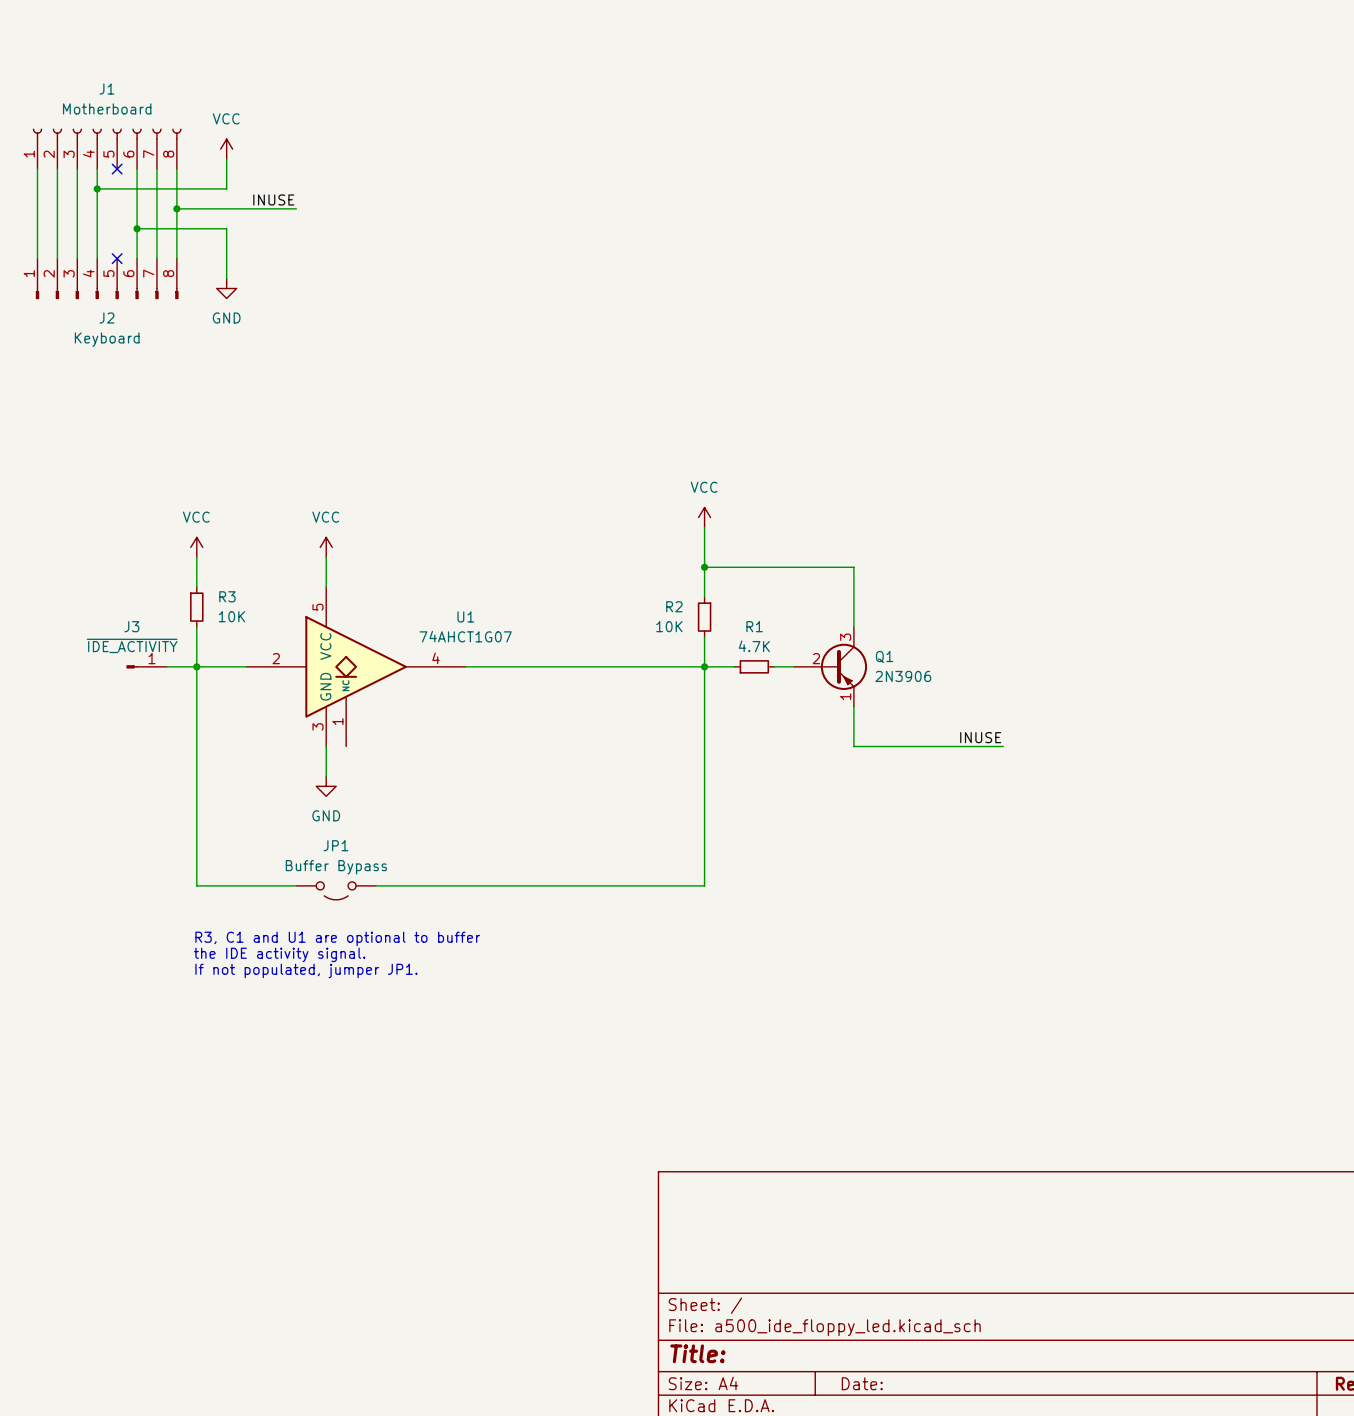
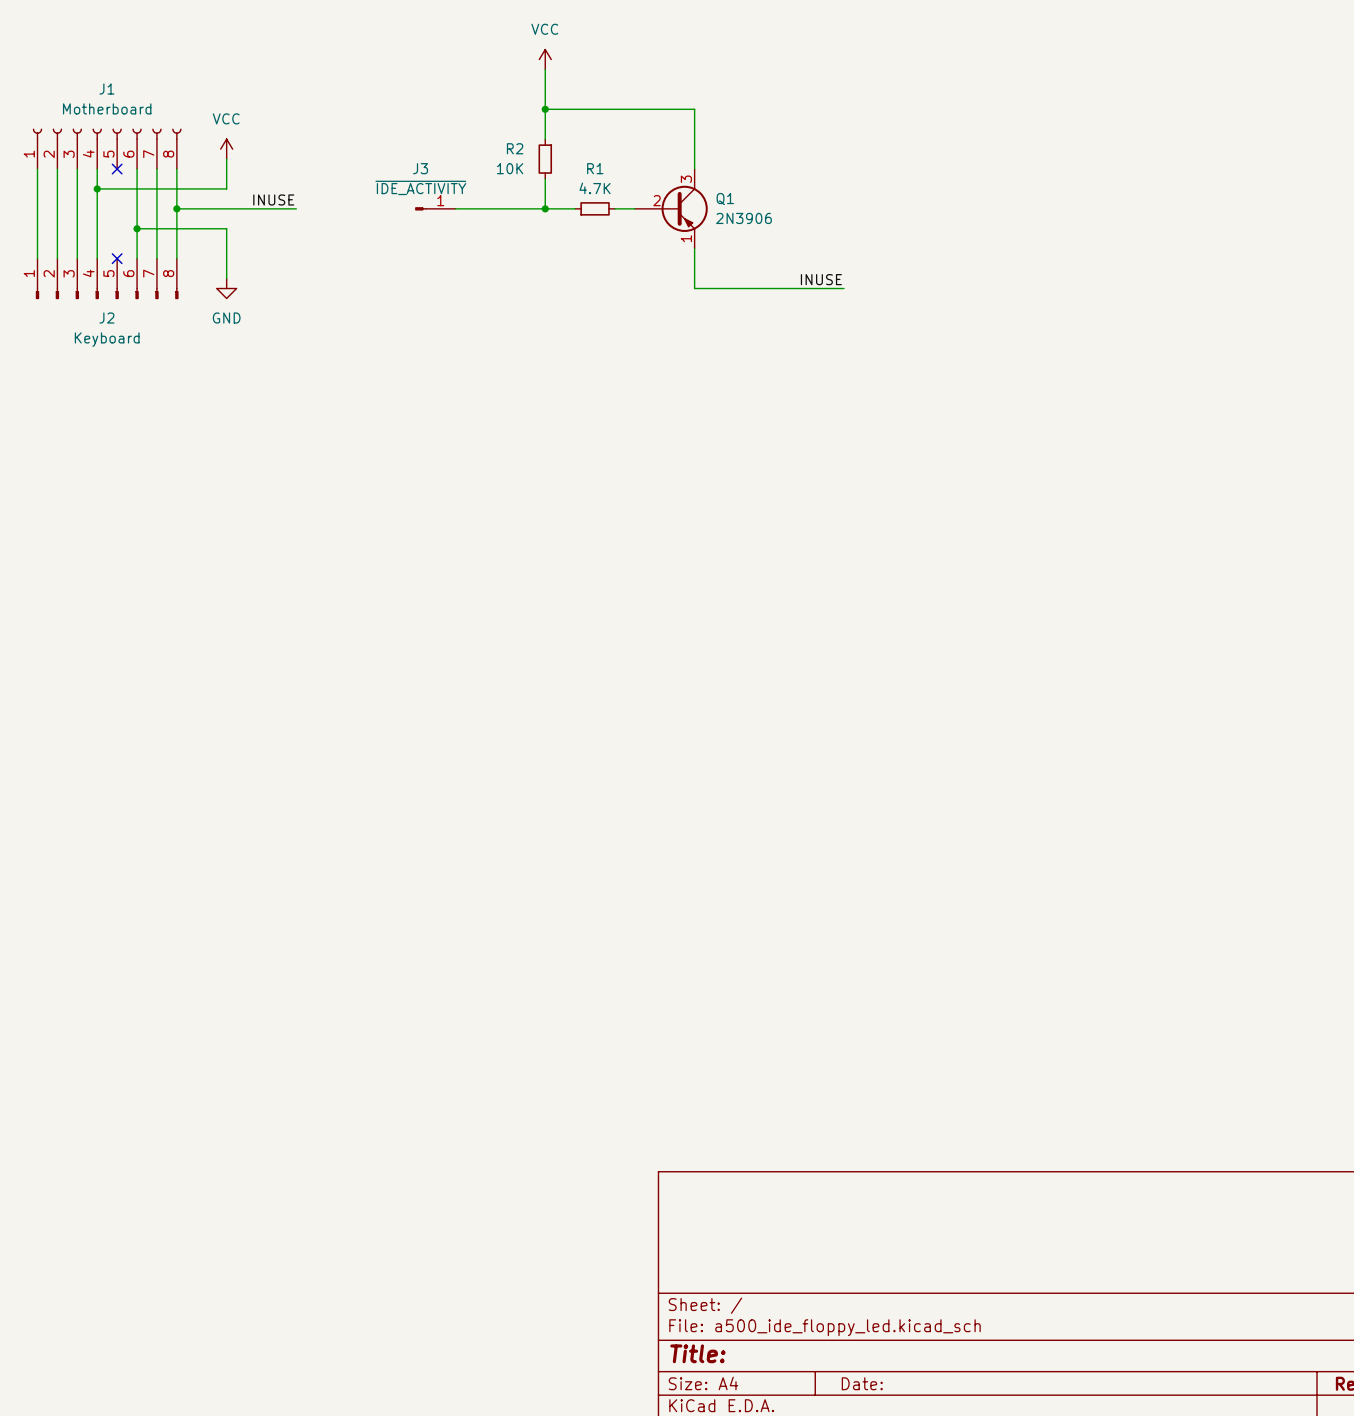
power symbol: none -> VCC (545, 59)
wire: none -> (545, 69) (545, 139)
wire: none -> (545, 109) (694, 109) (694, 169)
junction: none -> (545, 109)
wire: none -> (545, 179) (545, 208)
wire: none -> (455, 208) (575, 208)
junction: none -> (545, 208)
wire: none -> (614, 208) (634, 208)
wire: none -> (694, 248) (694, 288) (843, 288)
label: none -> INUSE (821, 279)
power symbol: VCC (704, 517) -> none
wire: (704, 527) (704, 597) -> none
power symbol: VCC (196, 547) -> none
power symbol: VCC (326, 547) -> none
wire: (196, 557) (196, 587) -> none
wire: (326, 557) (326, 587) -> none
wire: (704, 567) (853, 567) (853, 627) -> none
junction: (704, 567) -> none
R3: 10K (196, 607) -> none
R2 position: (704, 617) -> (545, 159)
wire: (196, 627) (196, 885) (296, 885) -> none
wire: (704, 636) (704, 885) (376, 885) -> none
J3 position: (146, 666) -> (435, 208)
wire: (166, 666) (246, 666) -> none
junction: (196, 666) -> none
U1: 74AHCT1G07 (356, 666) -> none
wire: (465, 666) (734, 666) -> none
junction: (704, 666) -> none
R1 position: (754, 666) -> (595, 208)
wire: (774, 666) (794, 666) -> none
Q1 position: (830, 666) -> (671, 208)
wire: (853, 706) (853, 746) (1003, 746) -> none
label: INUSE (980, 737) -> none
wire: (326, 746) (326, 776) -> none
power symbol: GND (326, 786) -> none
JP1: Buffer Bypass (336, 890) -> none
text: R3, C1 and U1 are optional to buffer (337, 938) -> none
text: the IDE activity signal. (279, 954) -> none
text: If not populated, jumper JP1. (306, 970) -> none

